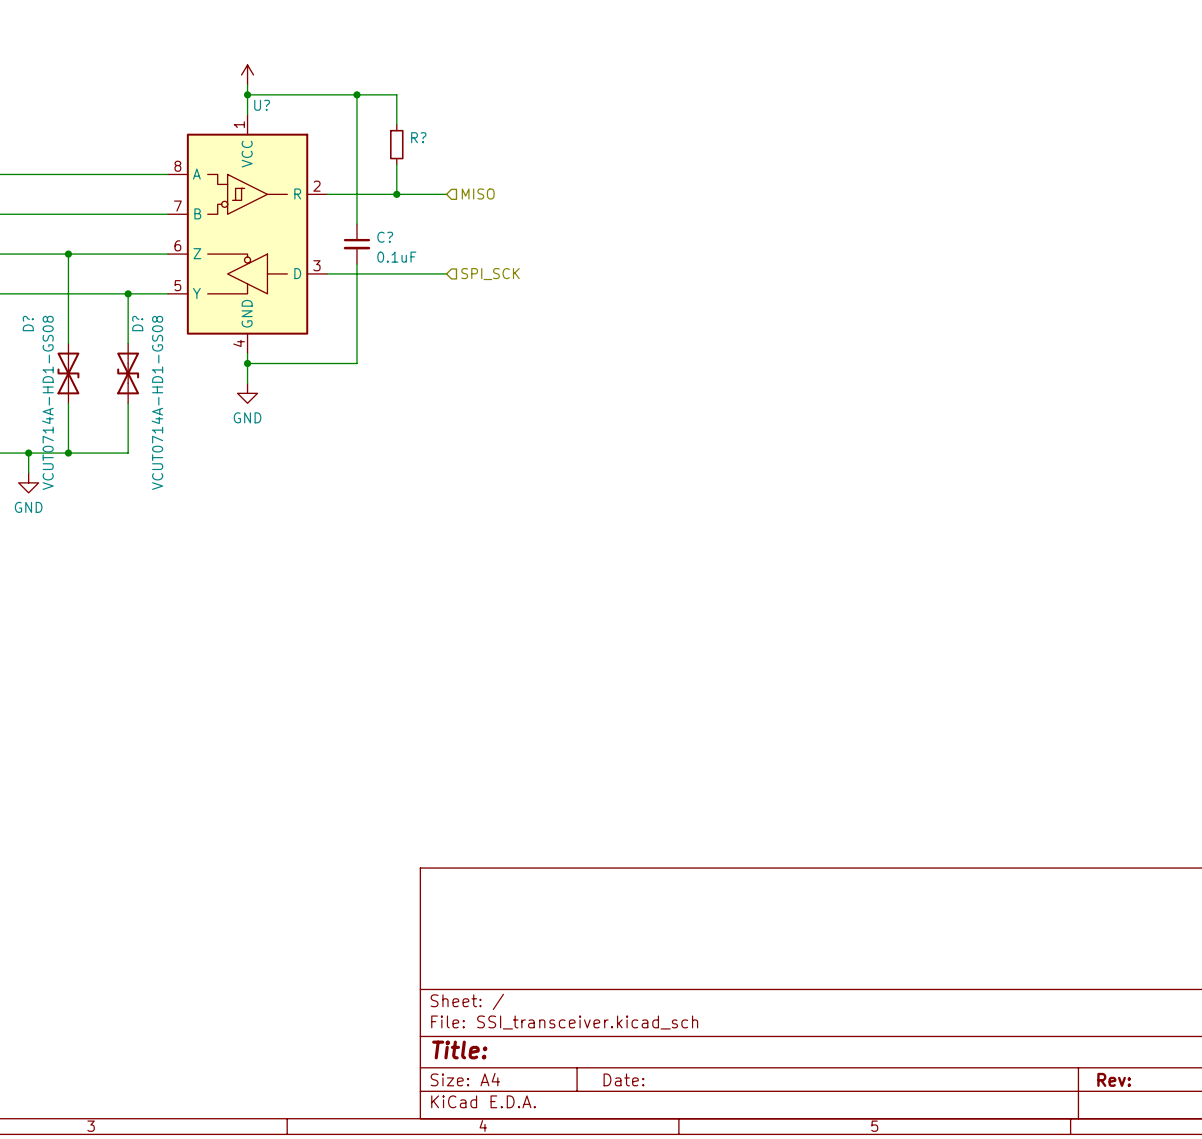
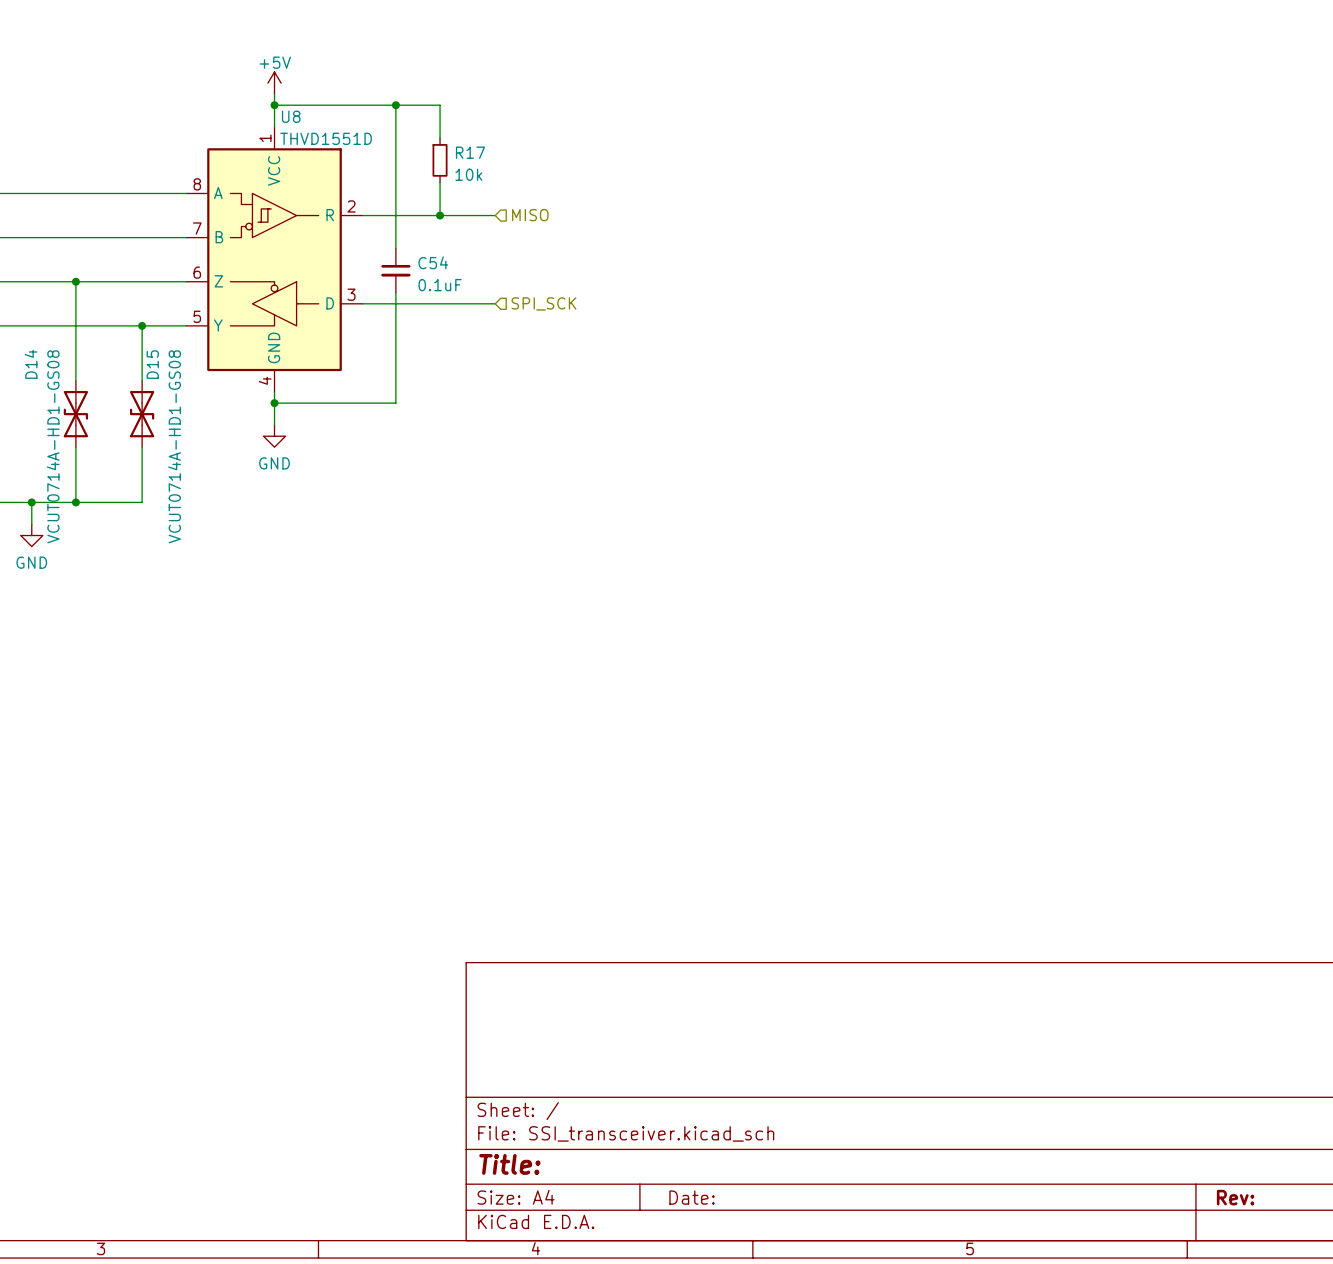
power symbol text: none -> +5V (275, 62)
U? name: U? (262, 105) -> U8 (291, 116)
U? value: none -> THVD1551D (326, 138)
R? name: R? (418, 137) -> R17 (470, 152)
R? value: none -> 10k (468, 174)
C? name: C? (385, 237) -> C54 (433, 262)
D? name: D? (28, 323) -> D14 (31, 364)
D? name: D? (137, 323) -> D15 (152, 364)

